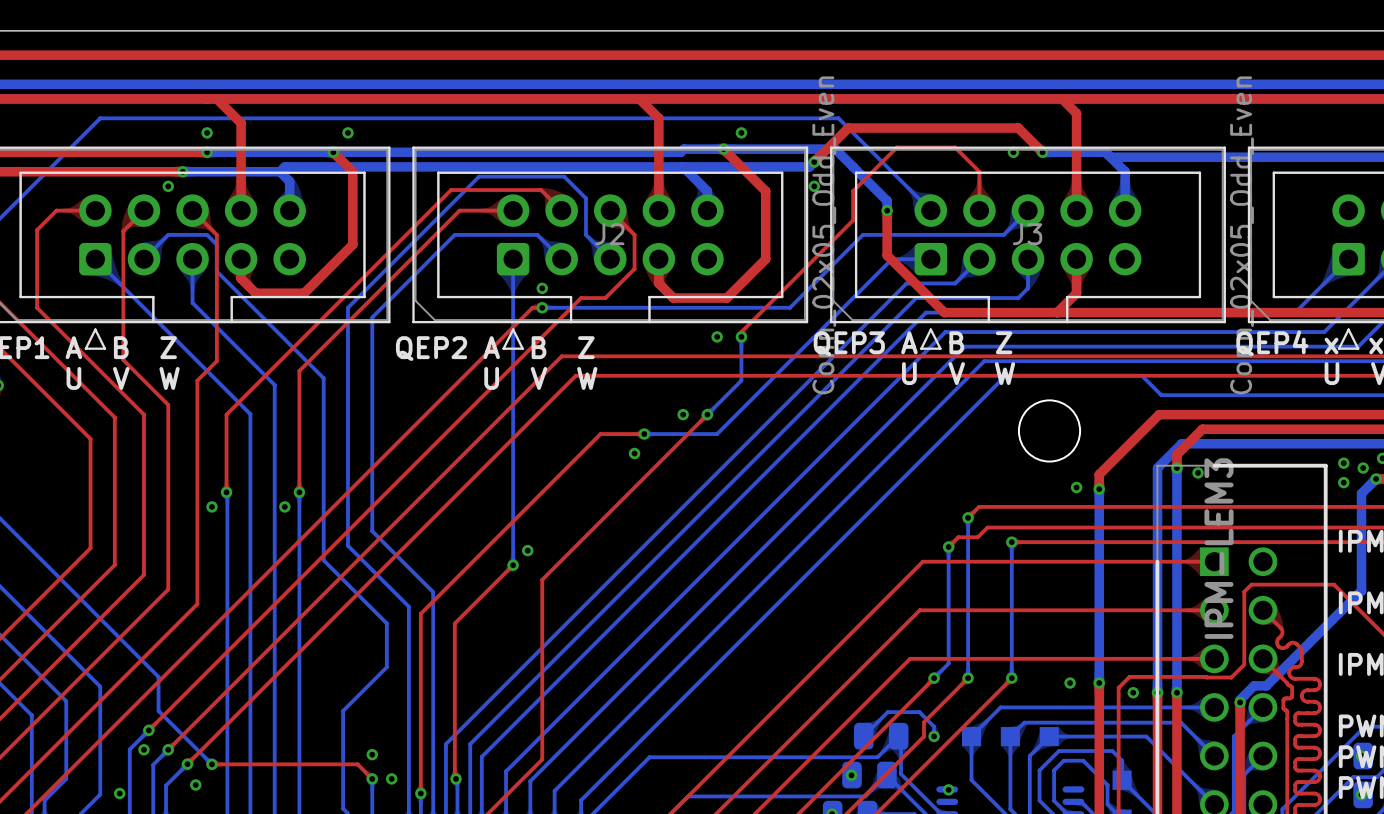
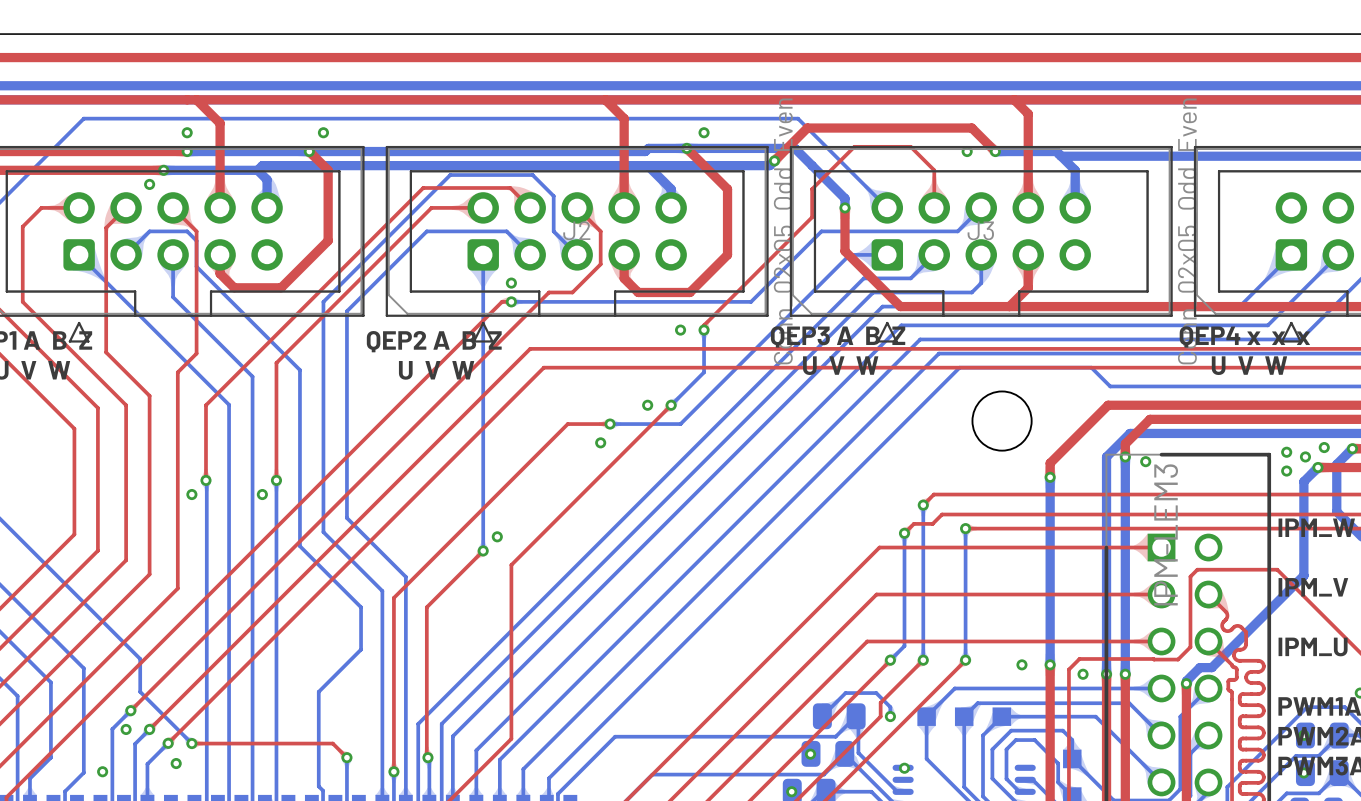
via: (814, 186) -> none
via: (1076, 487) -> none
via: (372, 754) -> none
via: (391, 778) -> none

